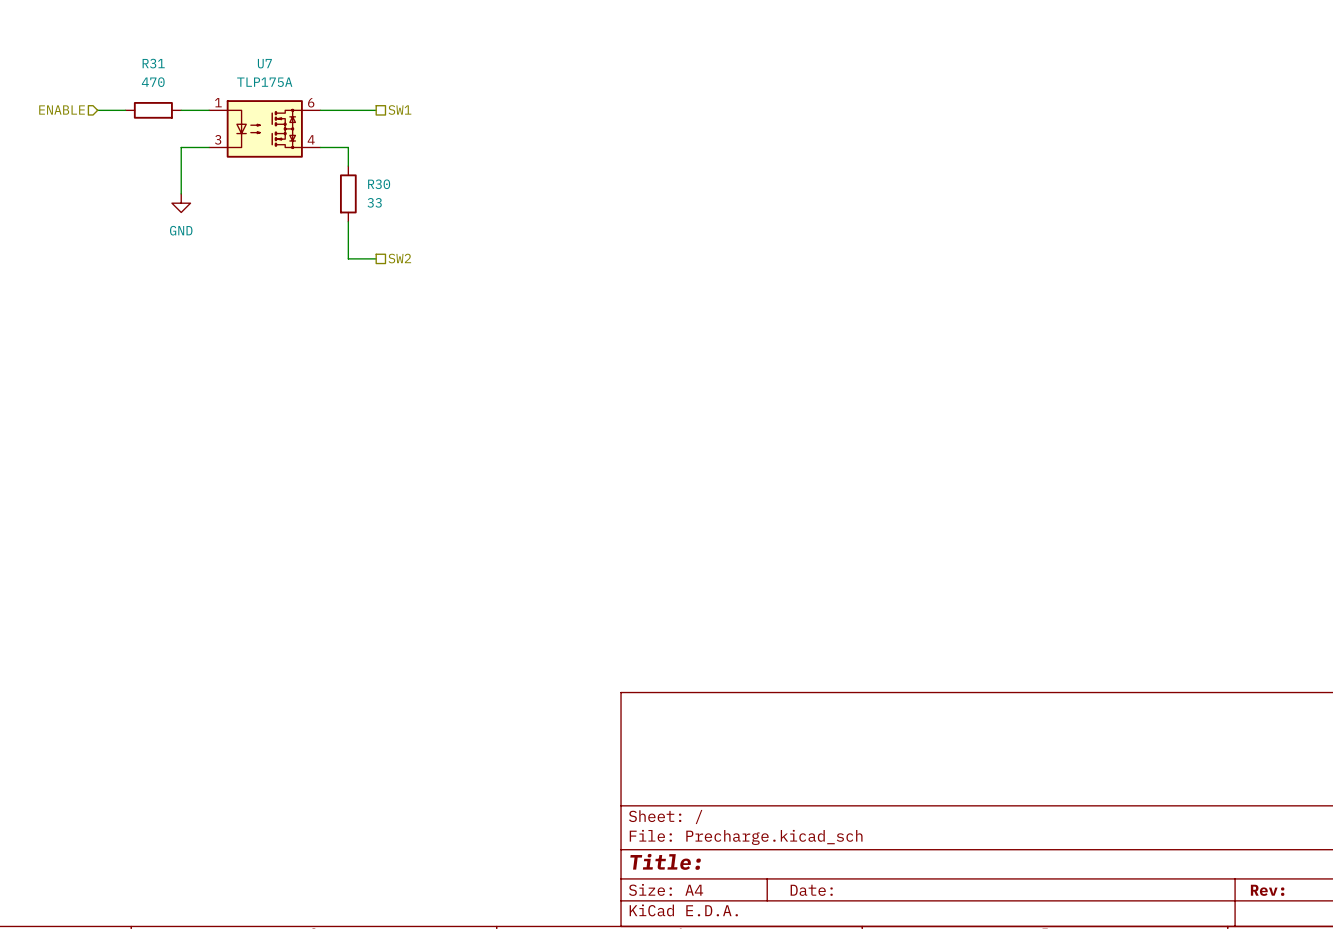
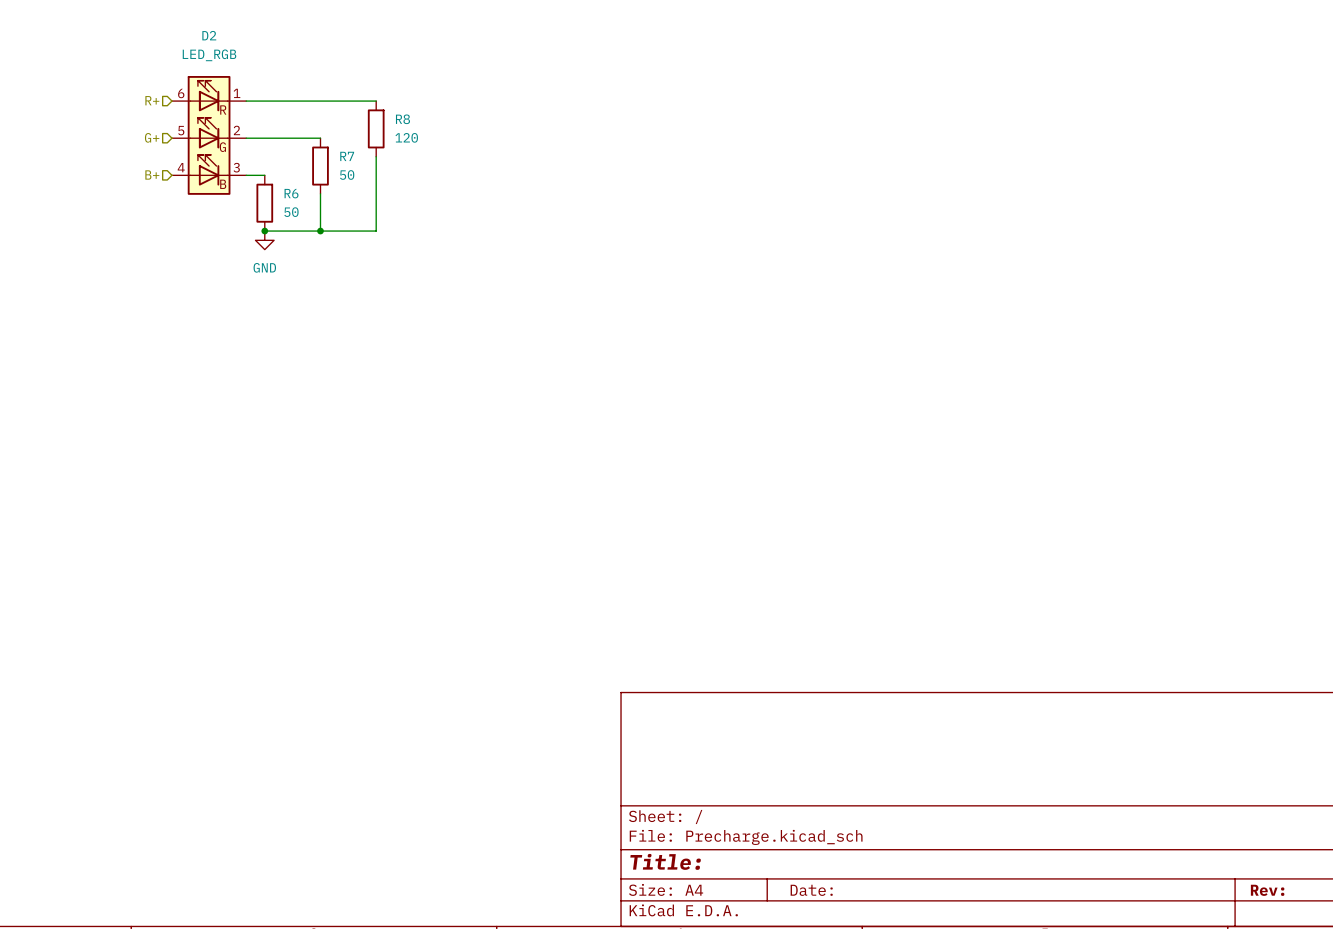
hierarchical label: none -> R+ (152, 100)
wire: none -> (246, 101) (376, 101)
hierarchical label: ENABLE (62, 110) -> none
wire: (97, 110) (125, 110) -> none
R31: 470 (153, 110) -> none
wire: (320, 110) (376, 110) -> none
hierarchical label: SW1 (399, 110) -> none
U7: TLP175A (264, 128) -> none
R8: none -> 120 (376, 128)
D2: none -> LED_RGB (209, 135)
hierarchical label: none -> G+ (152, 137)
wire: (209, 147) (181, 147) (181, 193) -> none
wire: (320, 147) (348, 147) (348, 166) -> none
wire: none -> (376, 156) (376, 231) (264, 231)
R7: none -> 50 (320, 166)
hierarchical label: none -> B+ (152, 174)
wire: none -> (246, 175) (264, 175)
wire: none -> (320, 193) (320, 231)
R30: 33 (348, 193) -> none
power symbol position: GND (181, 203) -> GND (264, 240)
R6: none -> 50 (264, 203)
wire: (348, 221) (348, 258) (376, 258) -> none
junction: none -> (264, 231)
junction: none -> (320, 231)
hierarchical label: SW2 (399, 258) -> none

